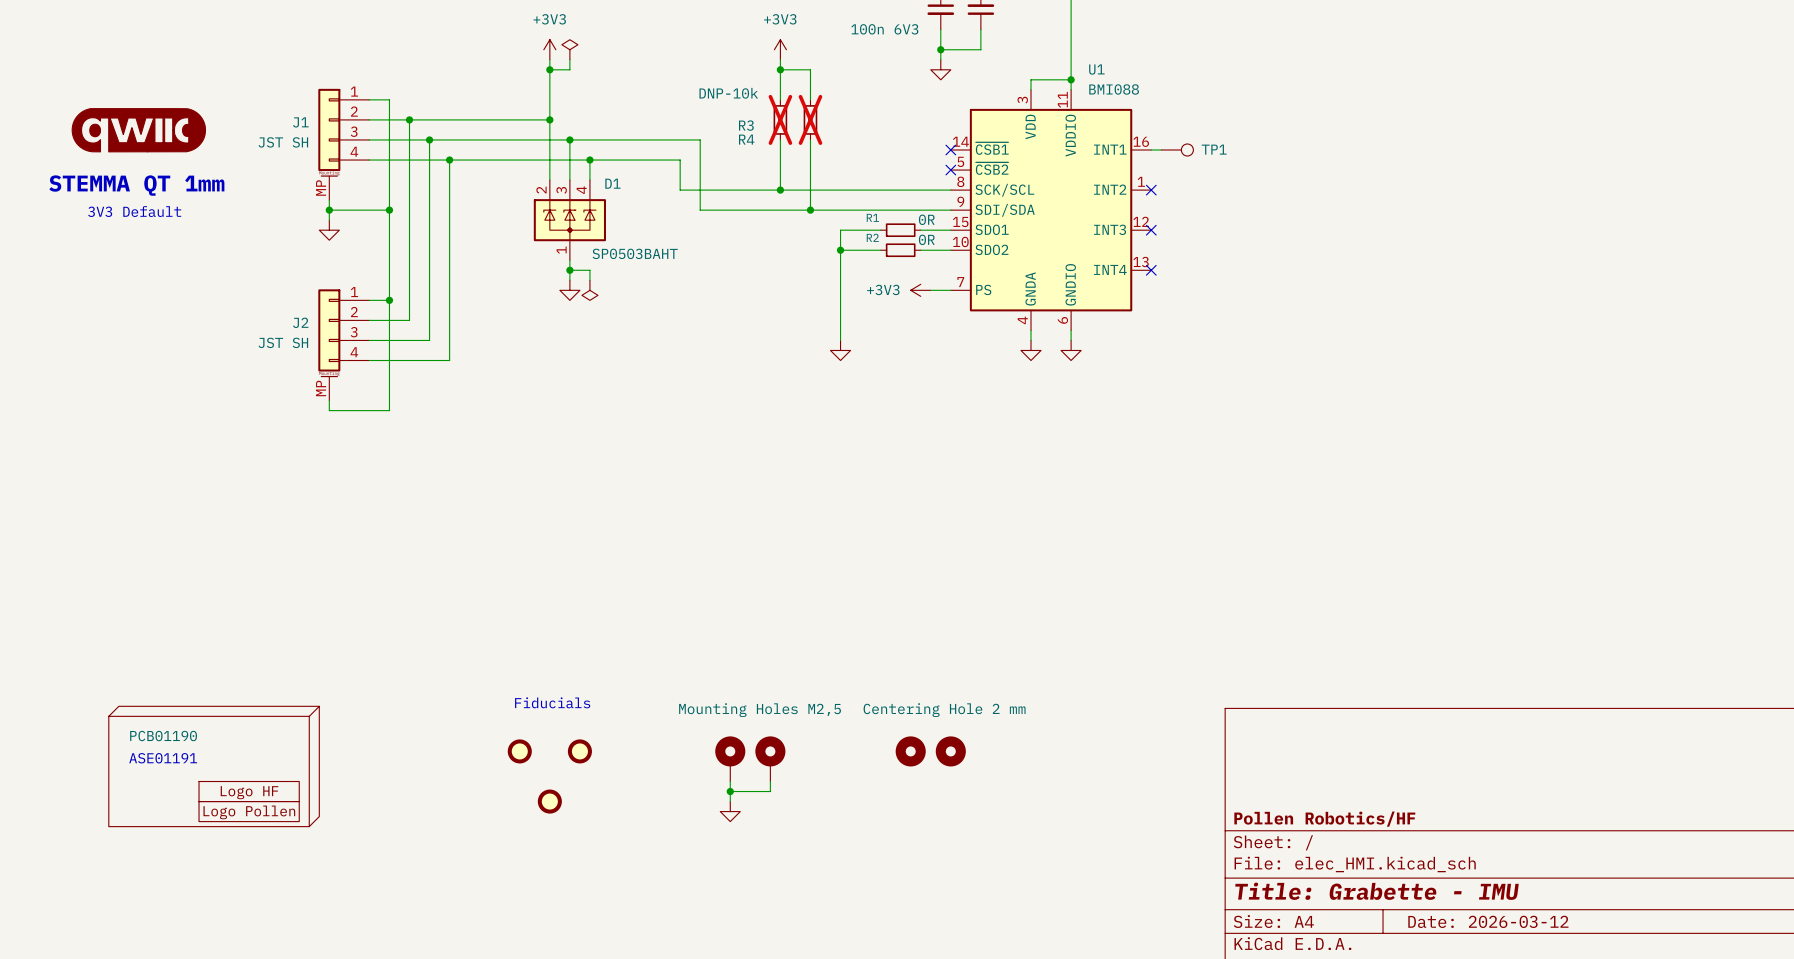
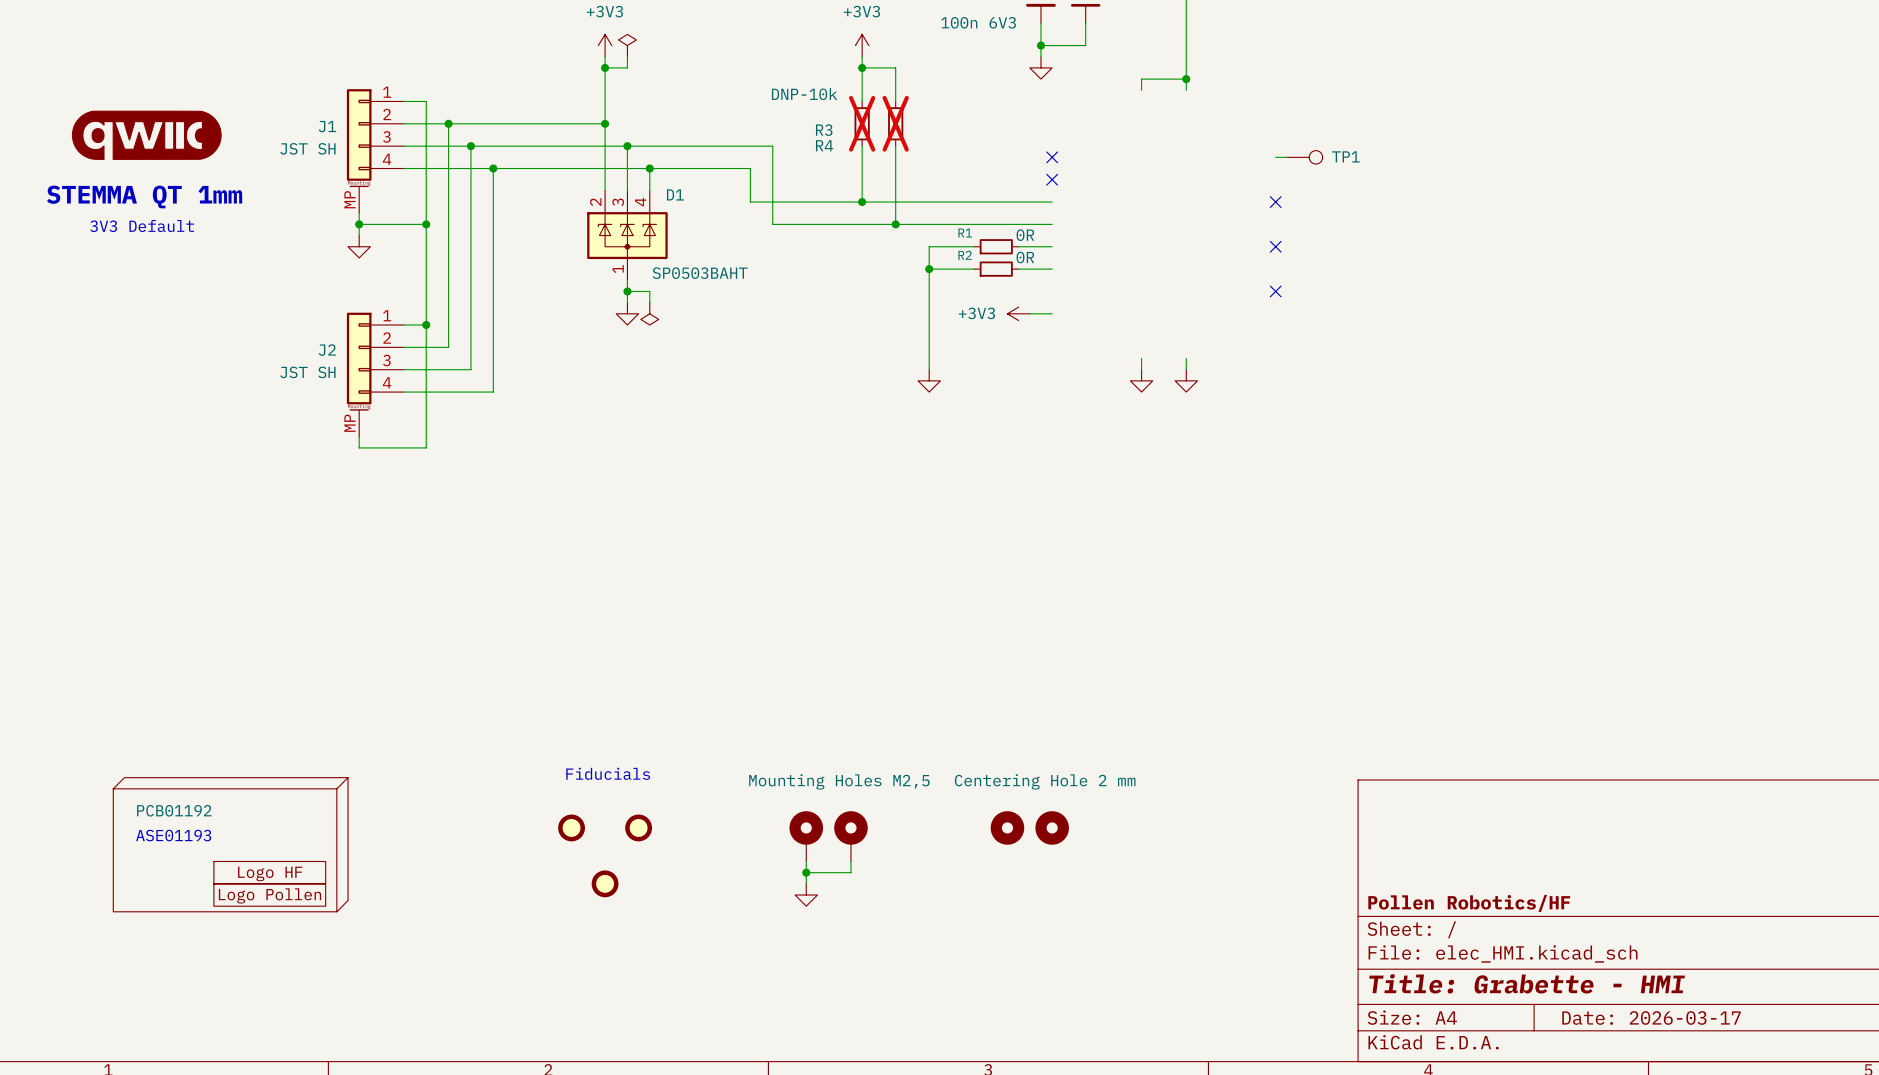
U1: BMI088 (1051, 210) -> none
part value: PCB01190 (163, 736) -> PCB01192 (174, 810)
text: ASE01191 (163, 758) -> ASE01193 (173, 835)
title block: Title: Grabette - IMU (1376, 891) -> Title: Grabette - HMI (1527, 983)
title block: Date: 2026-03-12 (1488, 921) -> Date: 2026-03-17 (1651, 1018)

